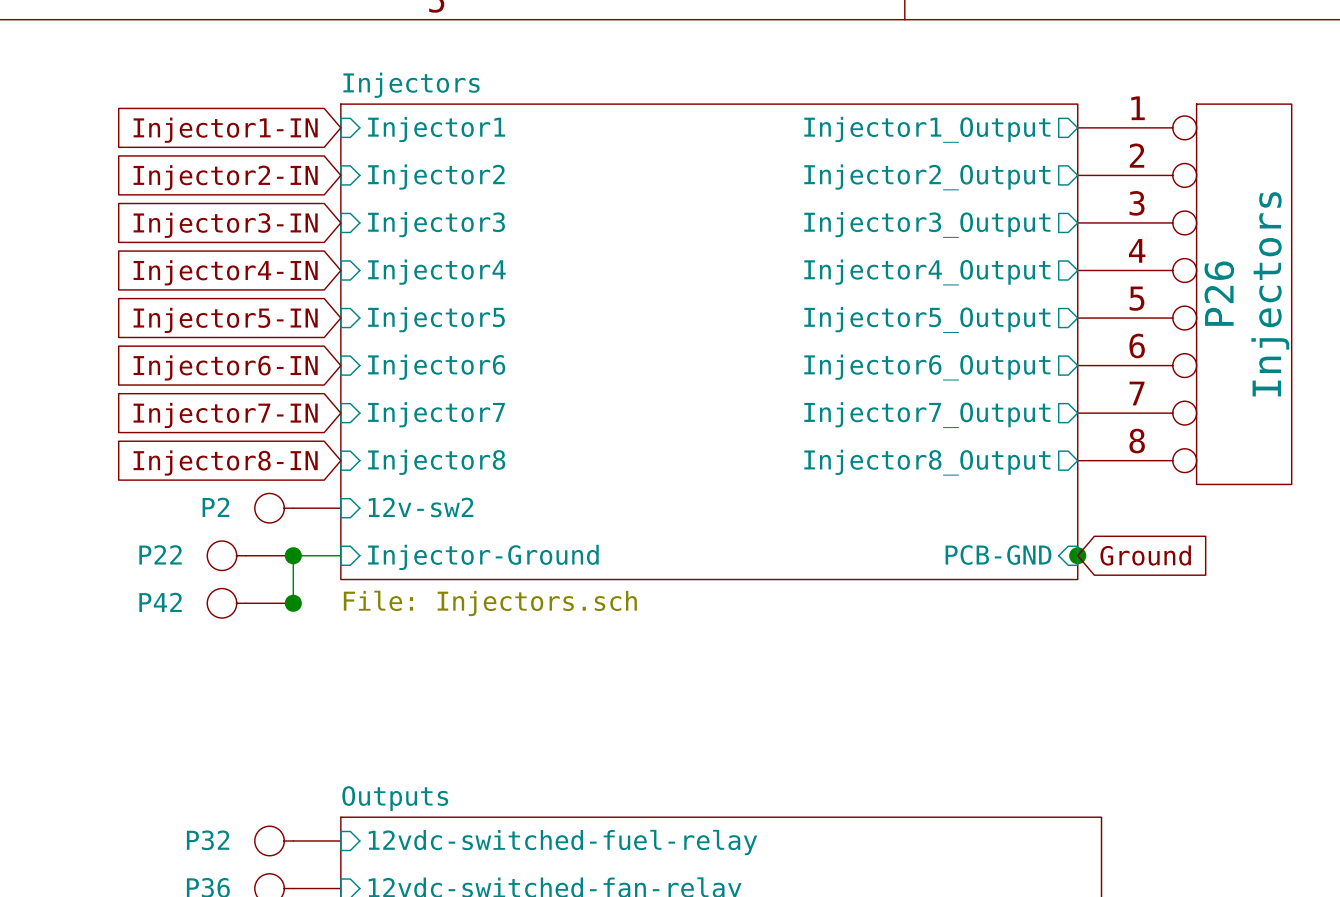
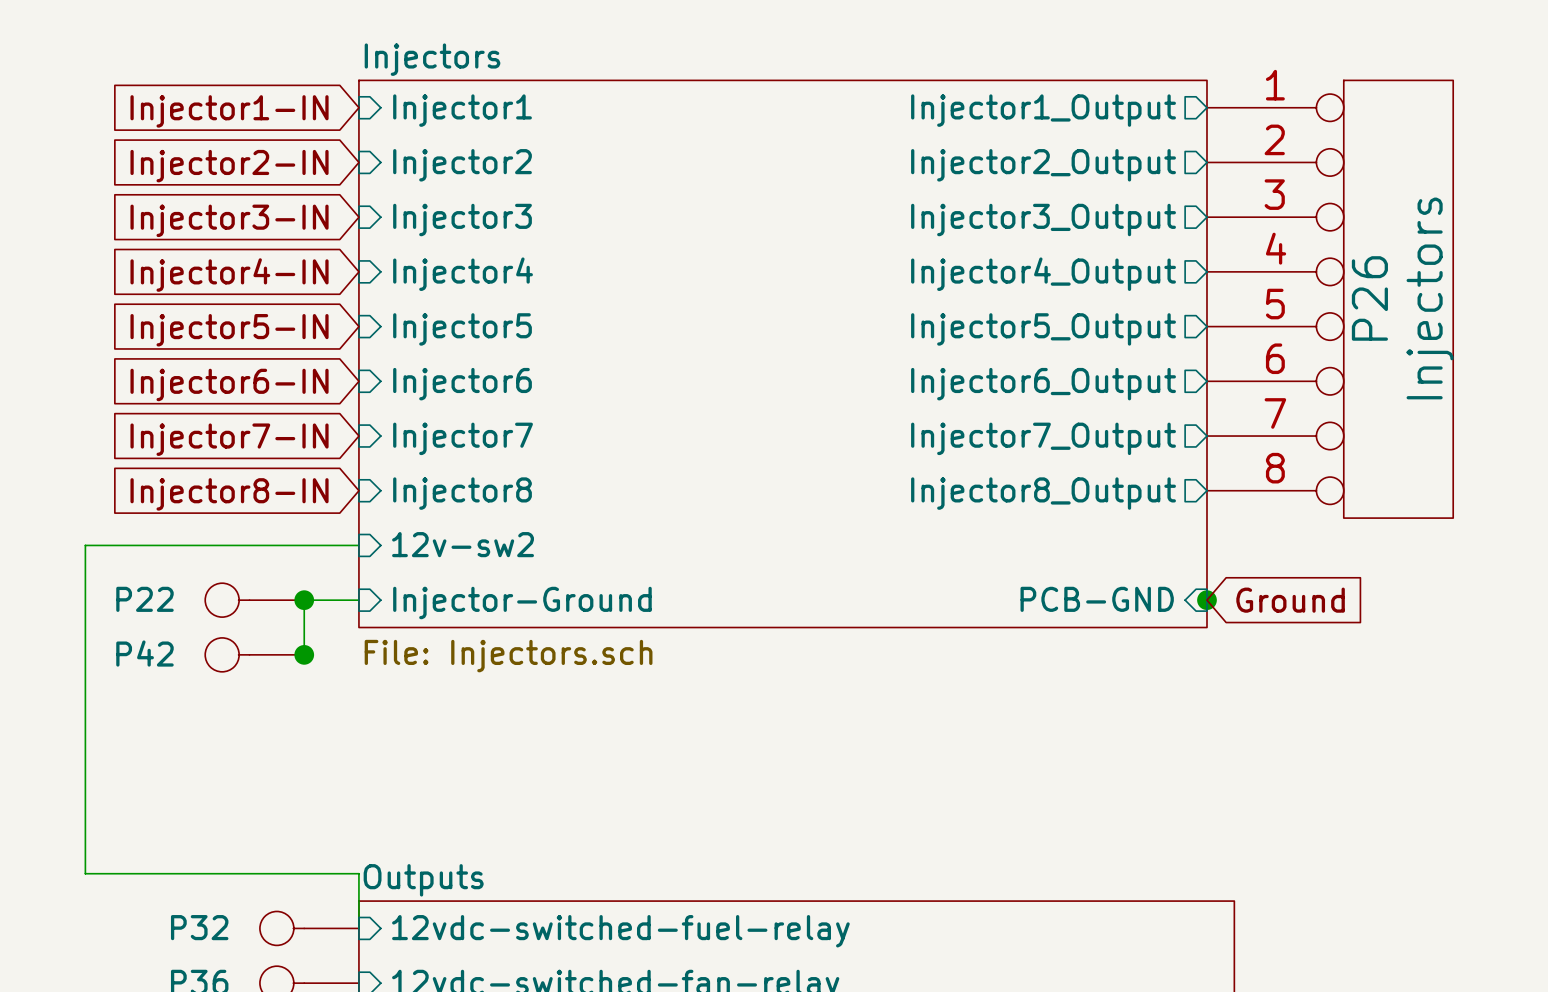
P2: (297, 508) -> none
wire: none -> (358, 545) (85, 545) (85, 873) (358, 873) (358, 928)

